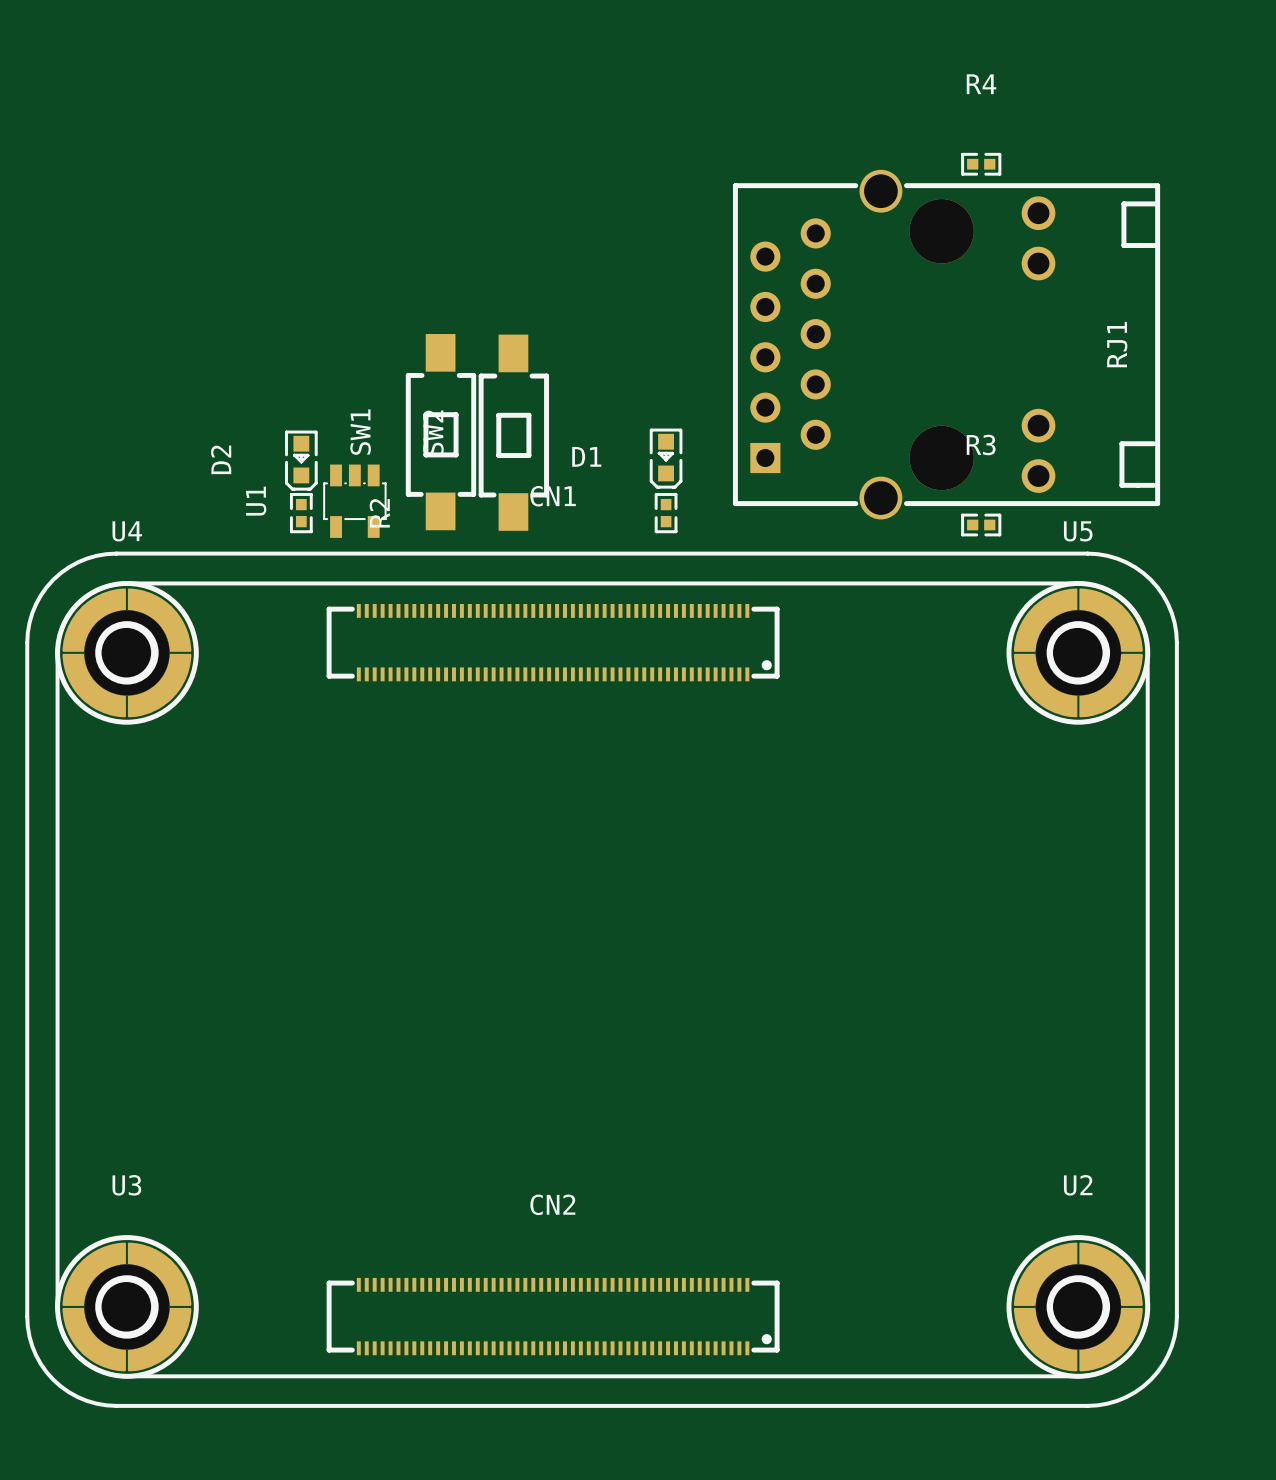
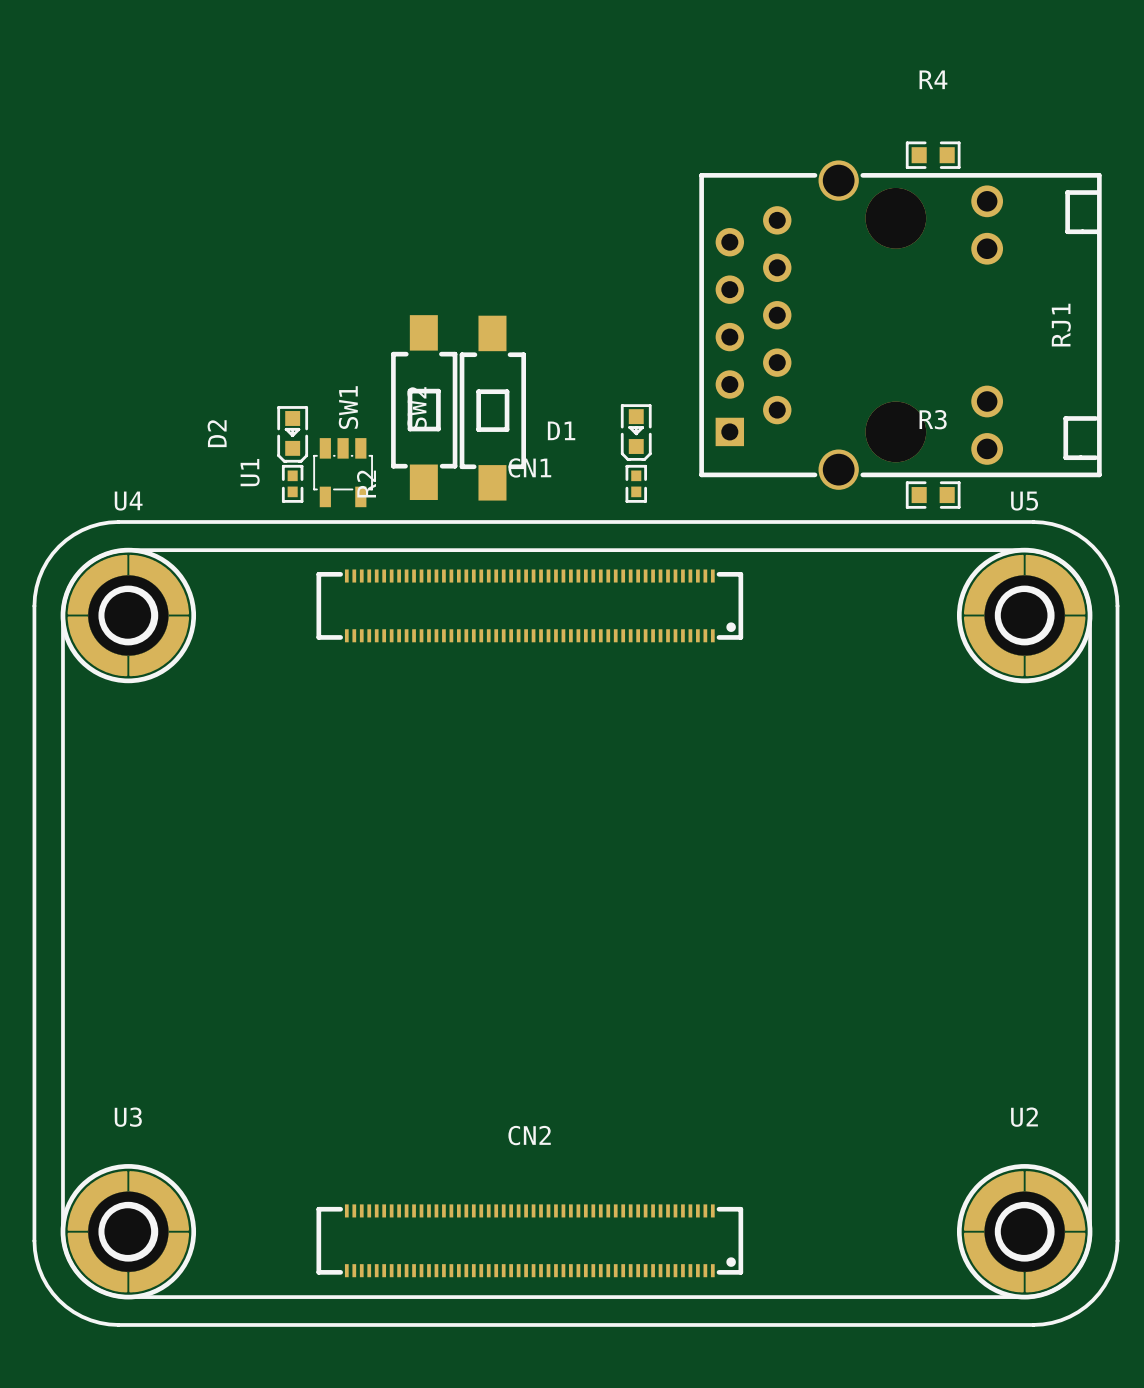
R4 footprint: [961, 152, 1002, 176] -> [905, 141, 961, 169]
R3 footprint: [961, 513, 1002, 537] -> [905, 481, 961, 509]

